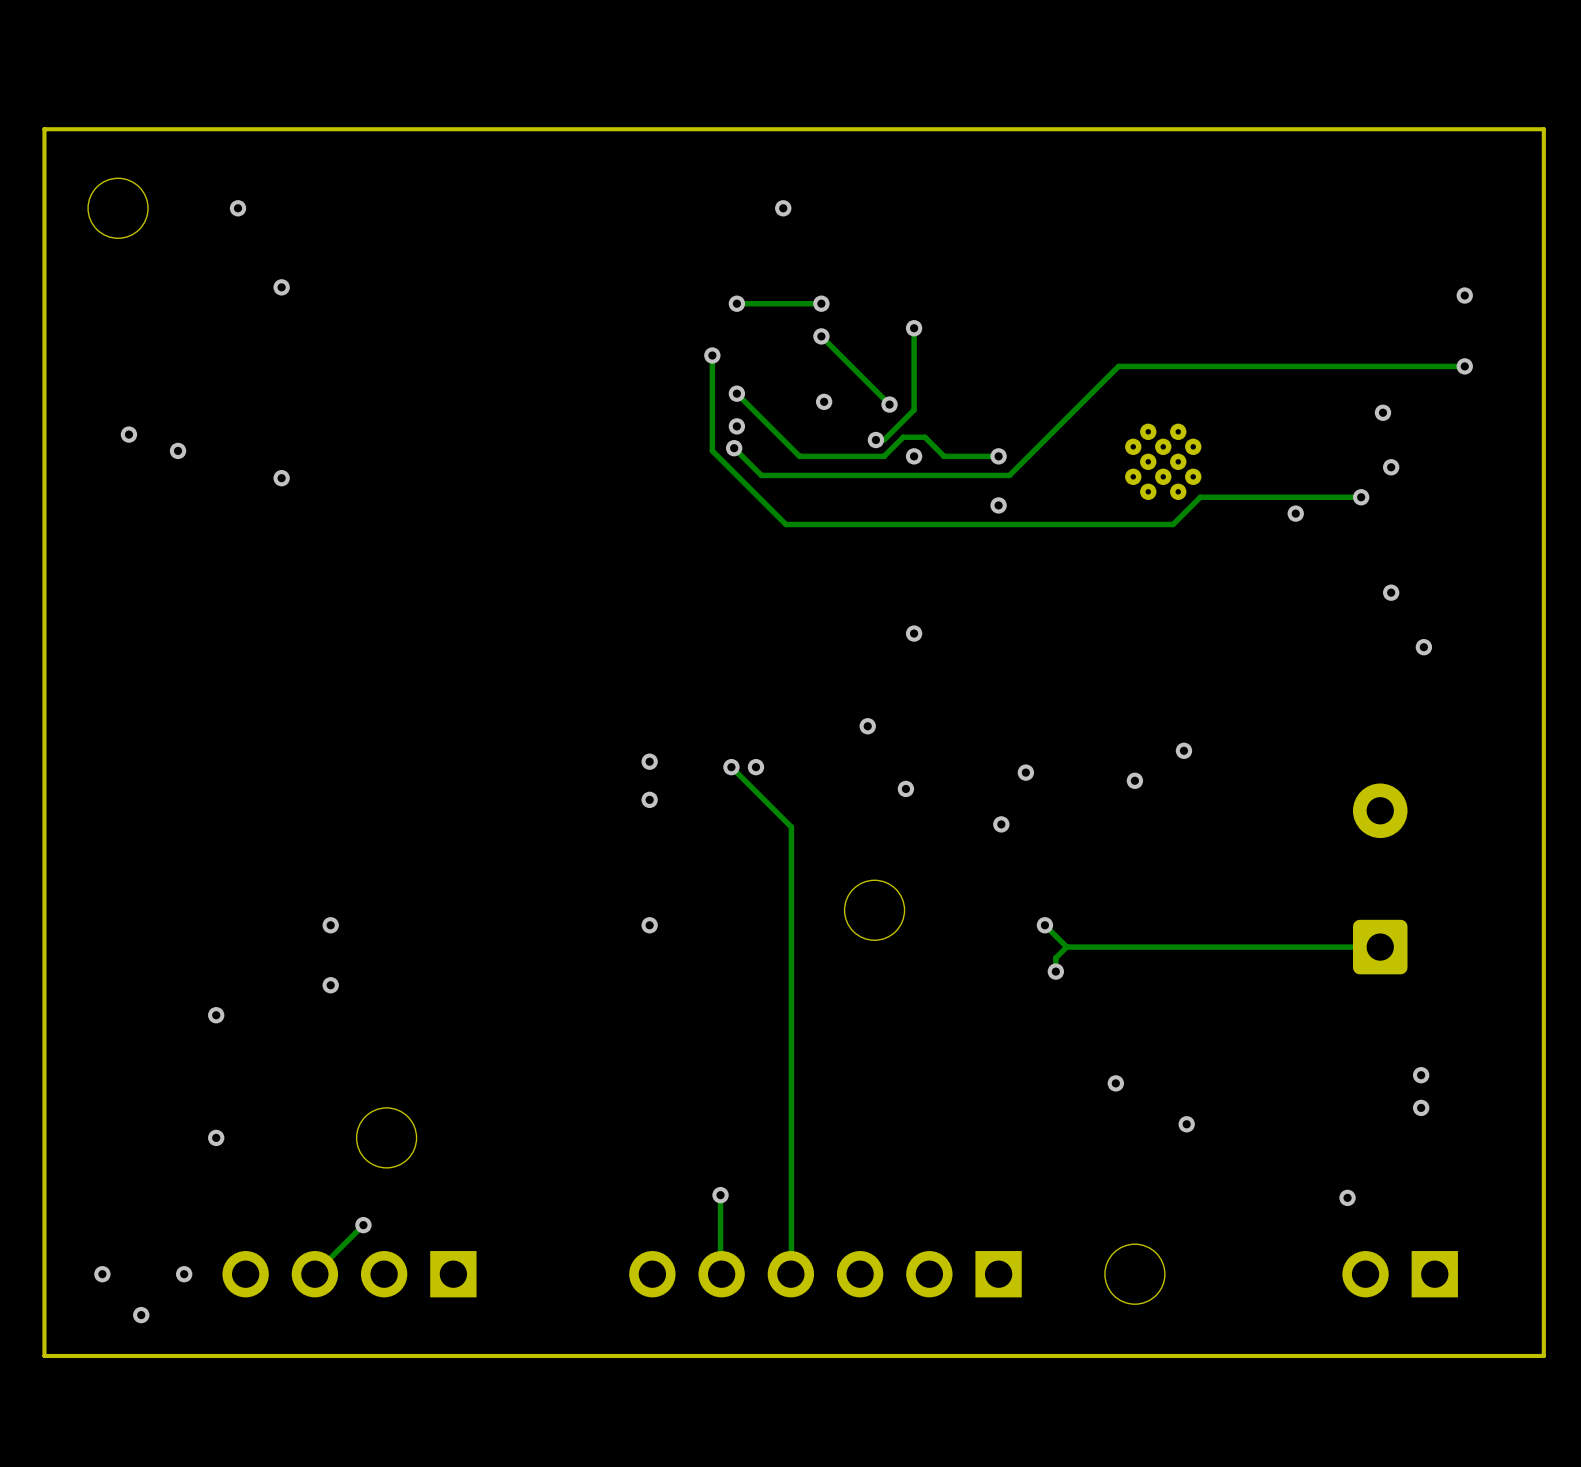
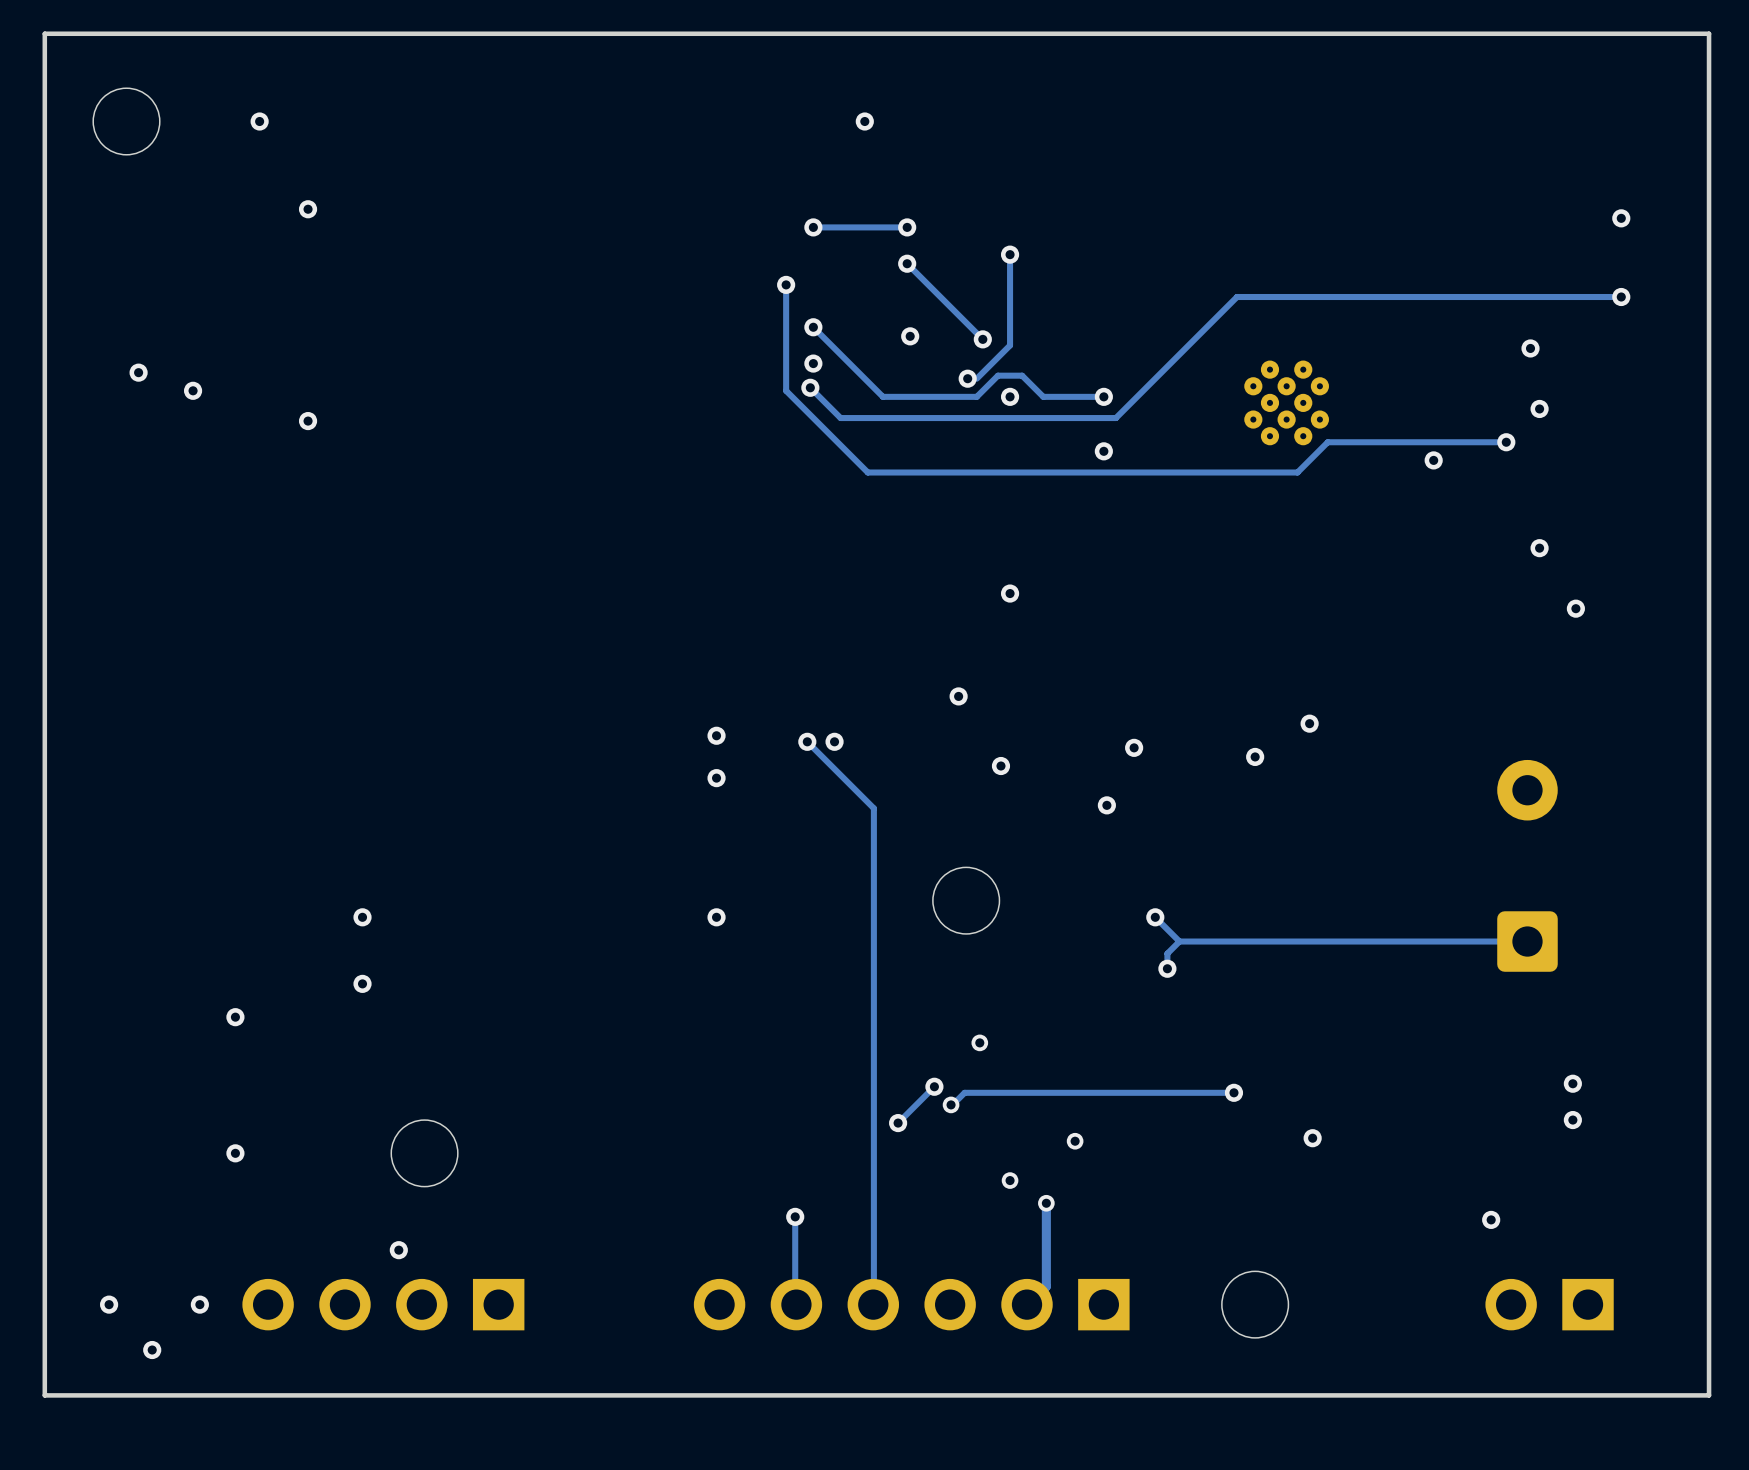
via: none -> (979, 1042)
track: none -> (934, 1086) (898, 1123)
via: none -> (934, 1086)
track: none -> (1233, 1092) (964, 1092) (952, 1104)
via: none -> (951, 1104)
via: none -> (898, 1123)
via: none -> (1075, 1141)
via: none -> (1010, 1180)
via: none -> (1046, 1203)
track: none -> (1046, 1204) (1046, 1286) (1027, 1304)
track: (363, 1225) (314, 1274) -> none

